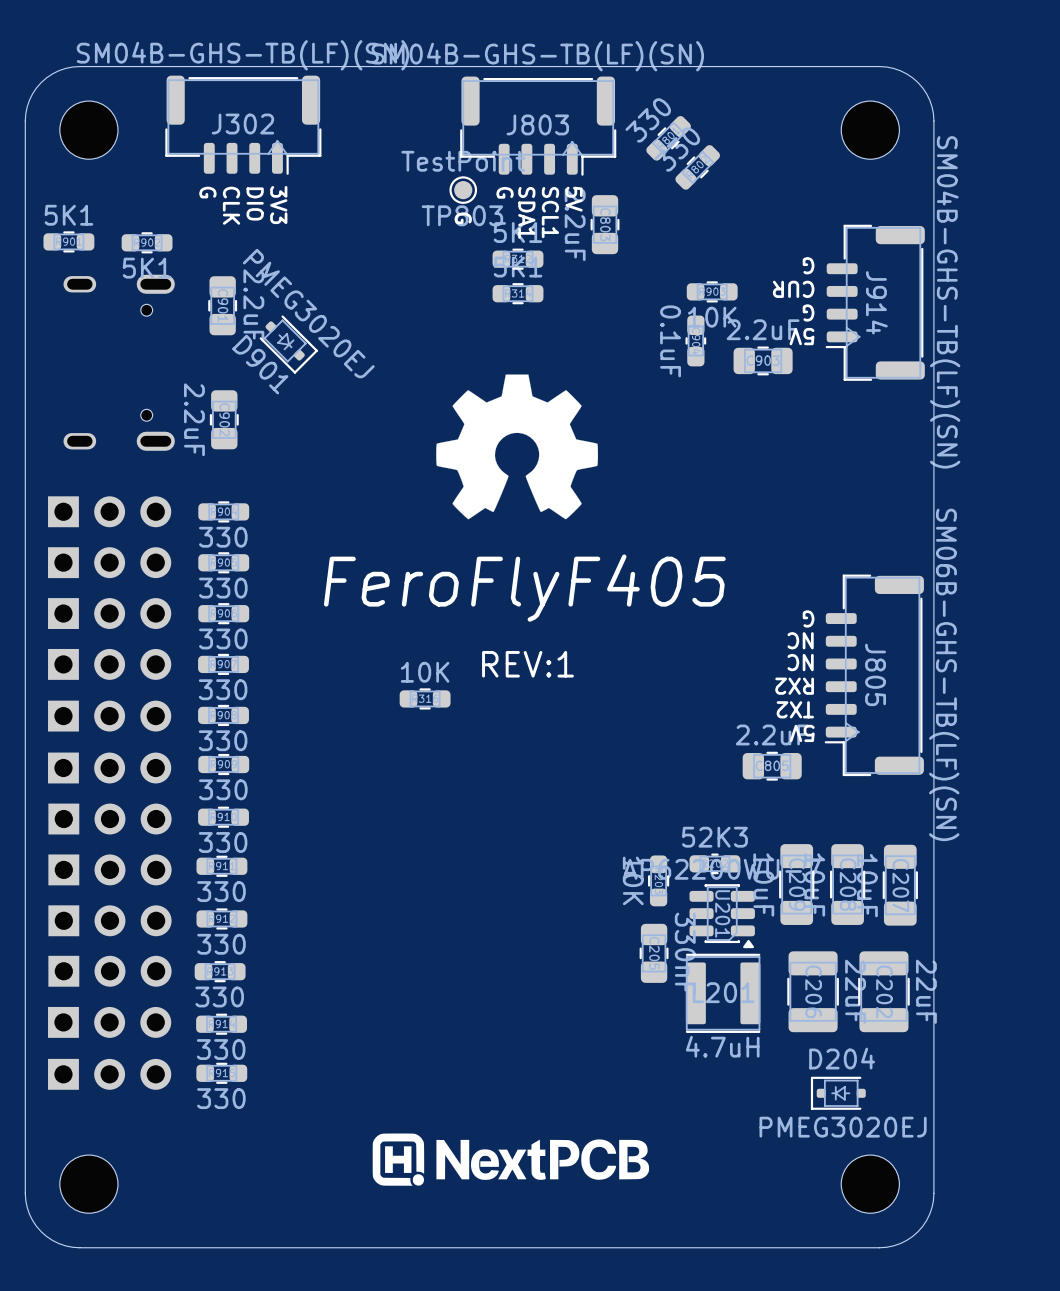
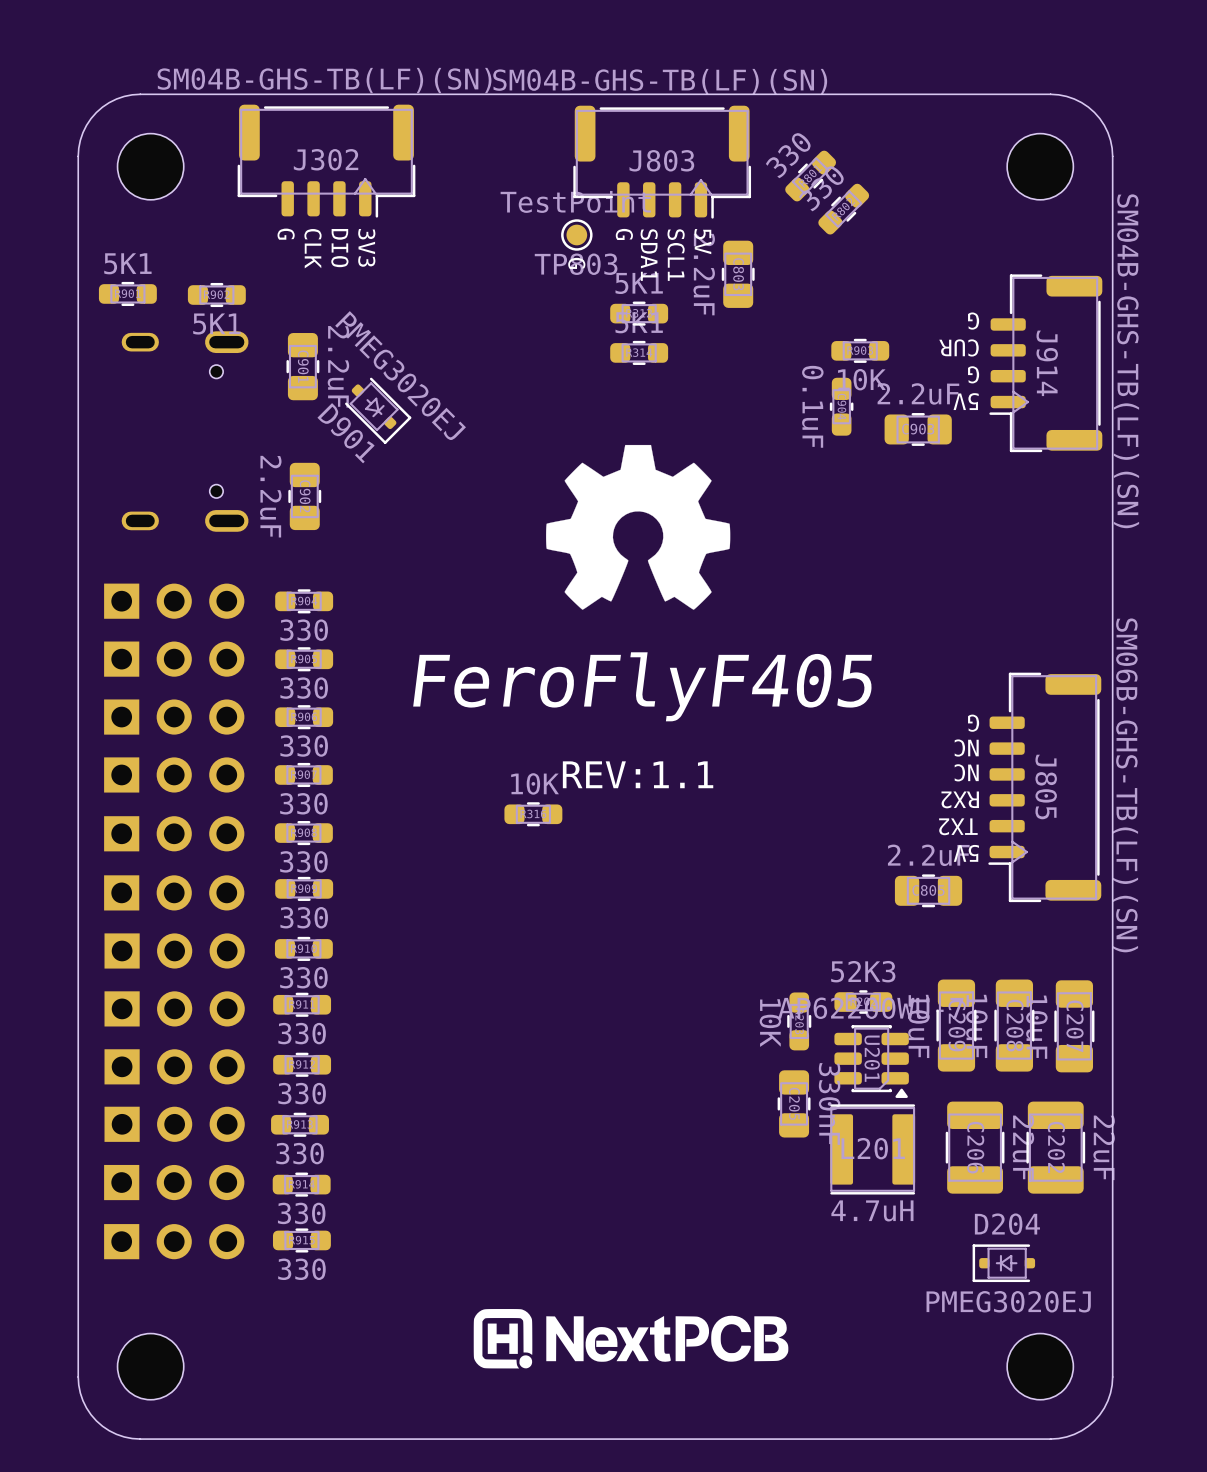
text: REV:1 (527, 664) -> REV:1.1 (638, 774)

